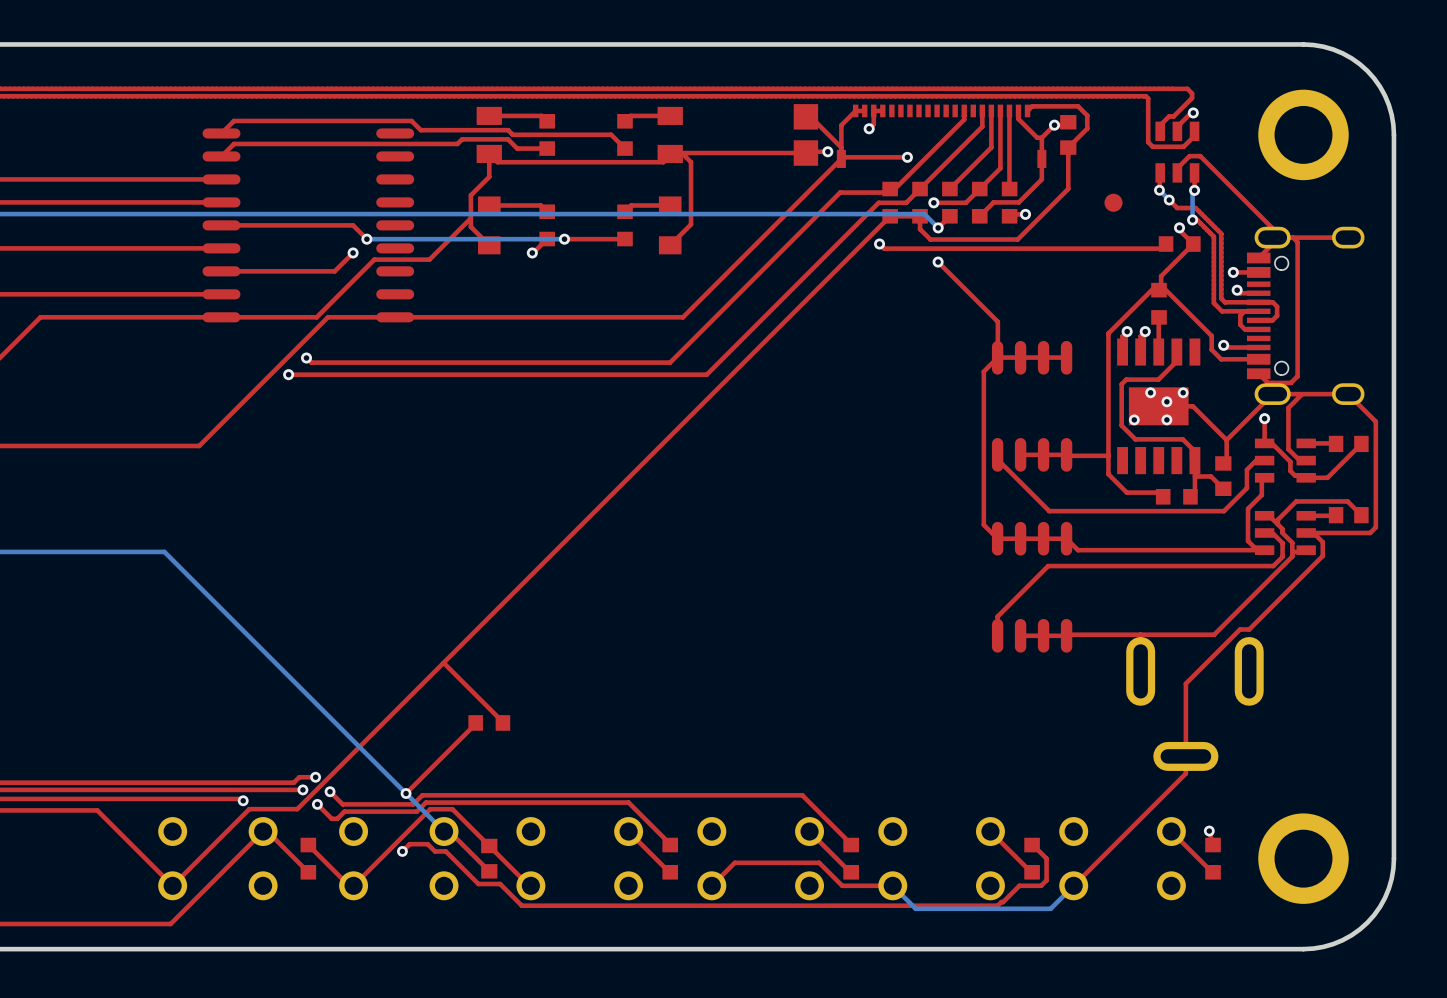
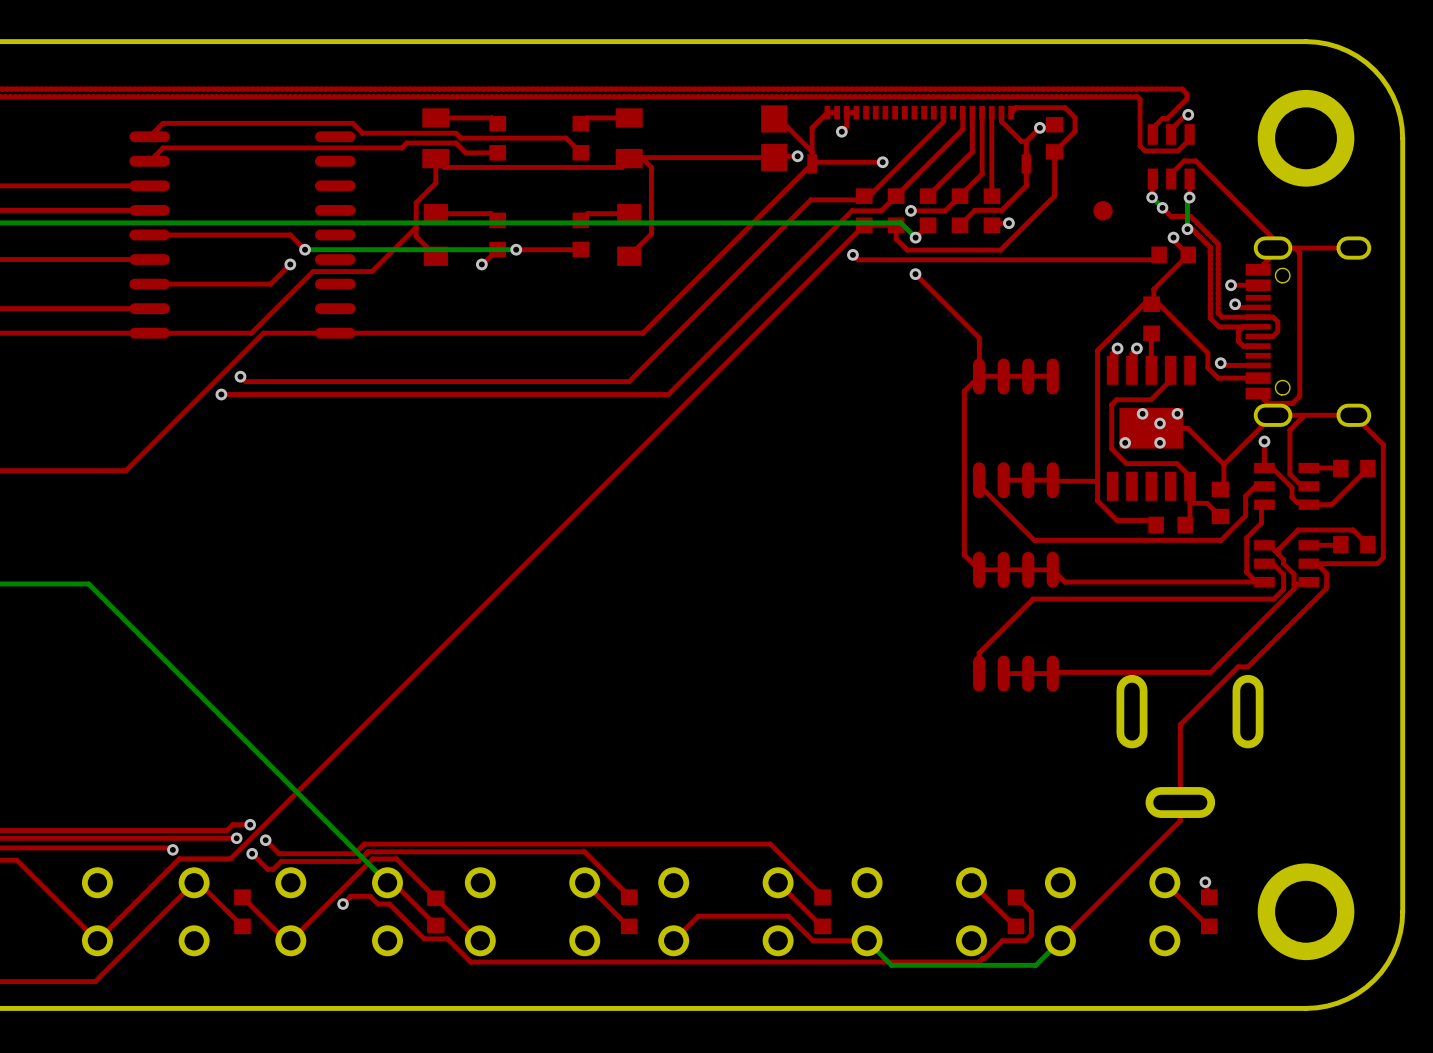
top track: (443, 663) (502, 722) -> none
top track: (475, 722) (406, 793) -> none
part: (489, 722) -> none
via: (406, 793) -> none

